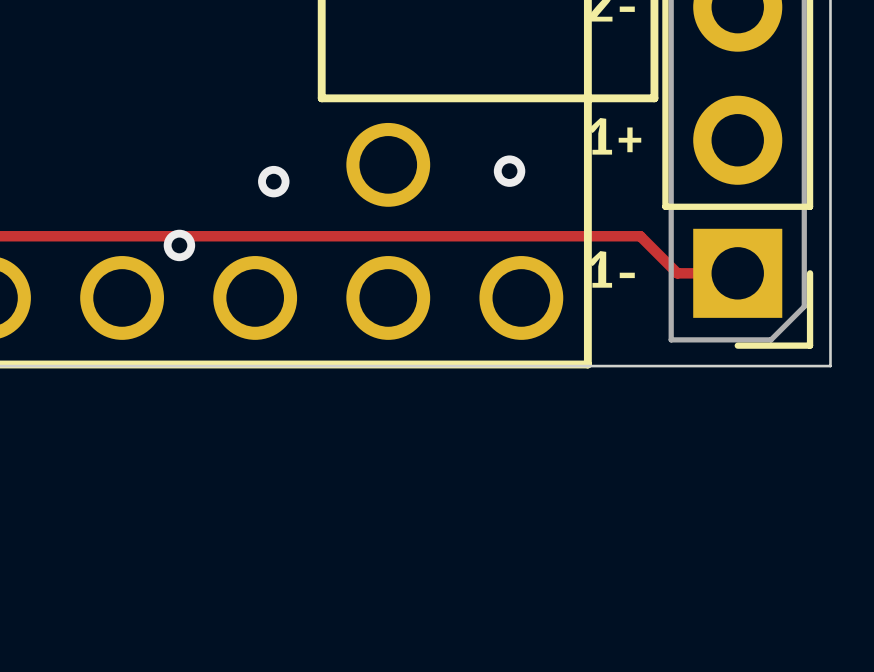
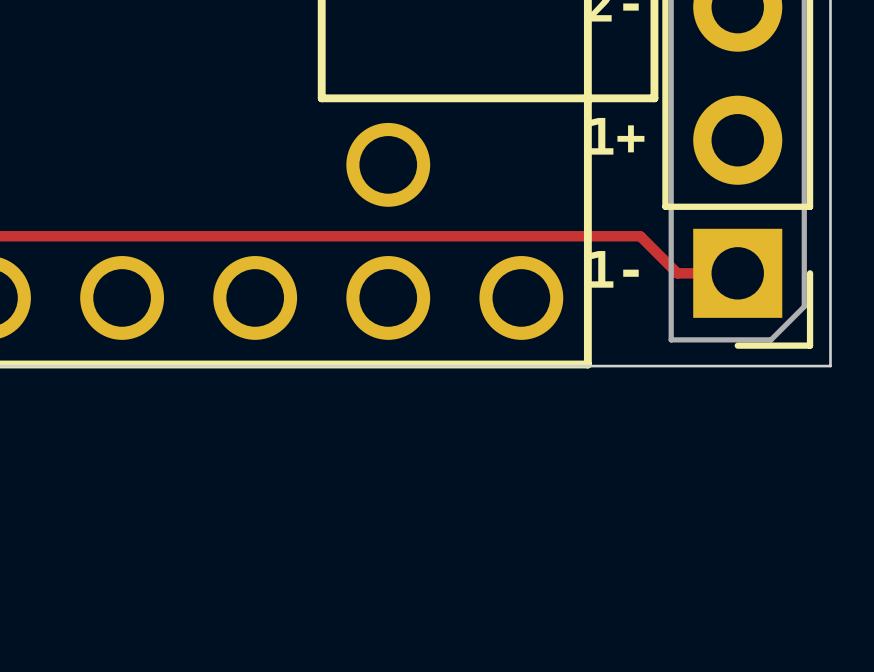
via: (509, 171) -> none
via: (273, 181) -> none
via: (179, 245) -> none

